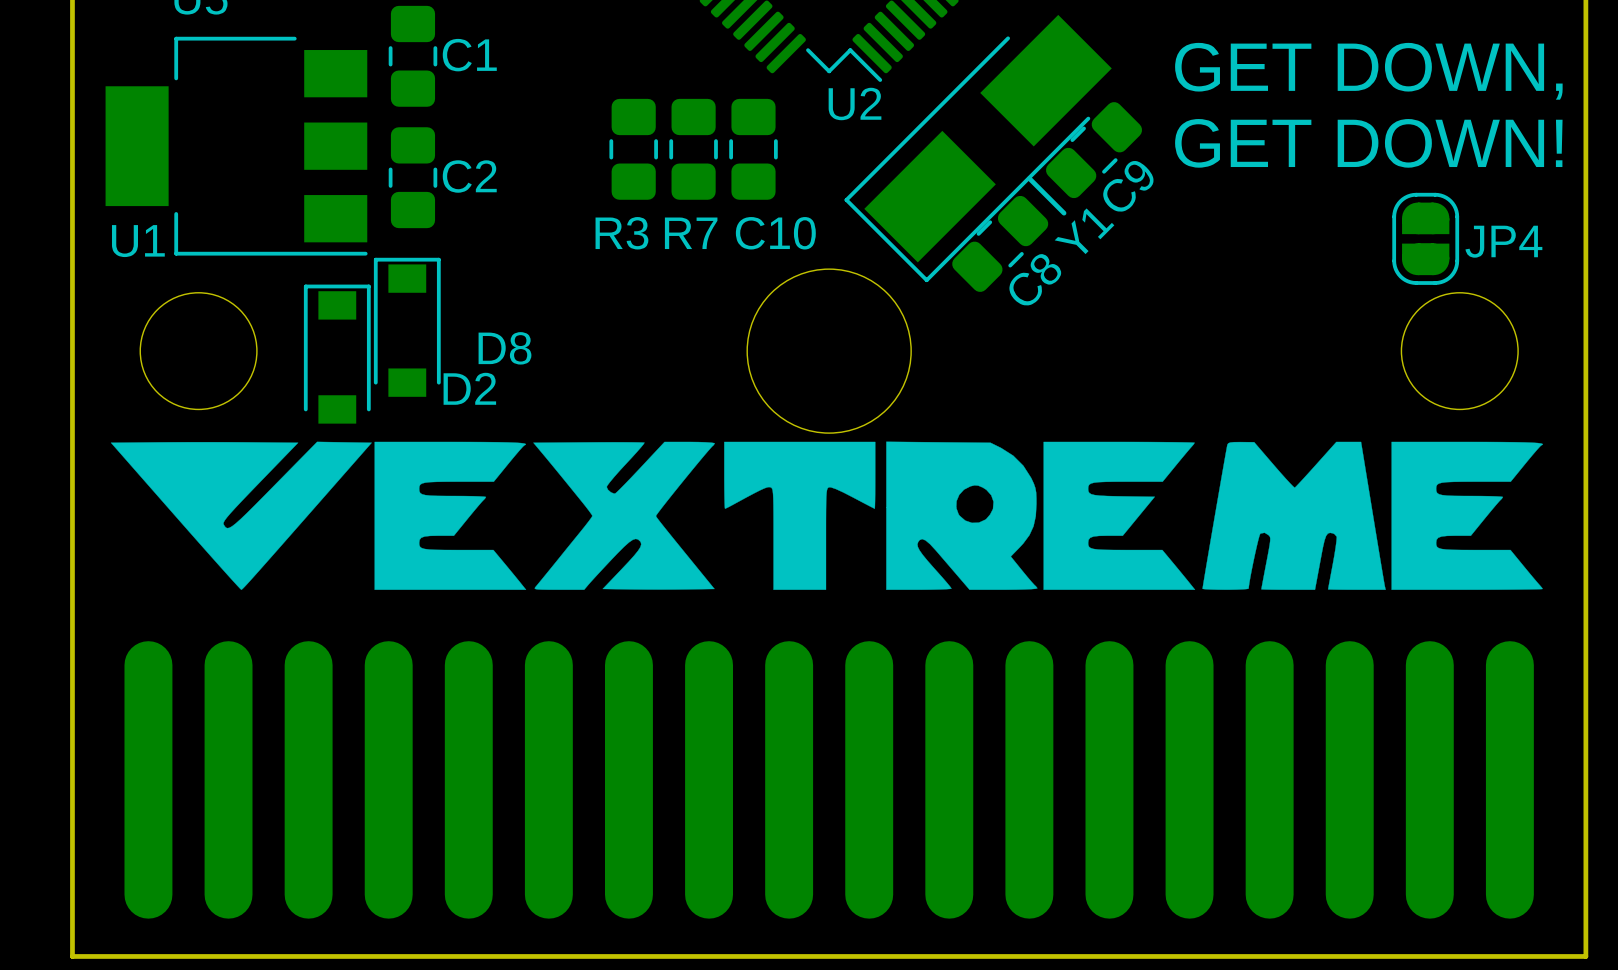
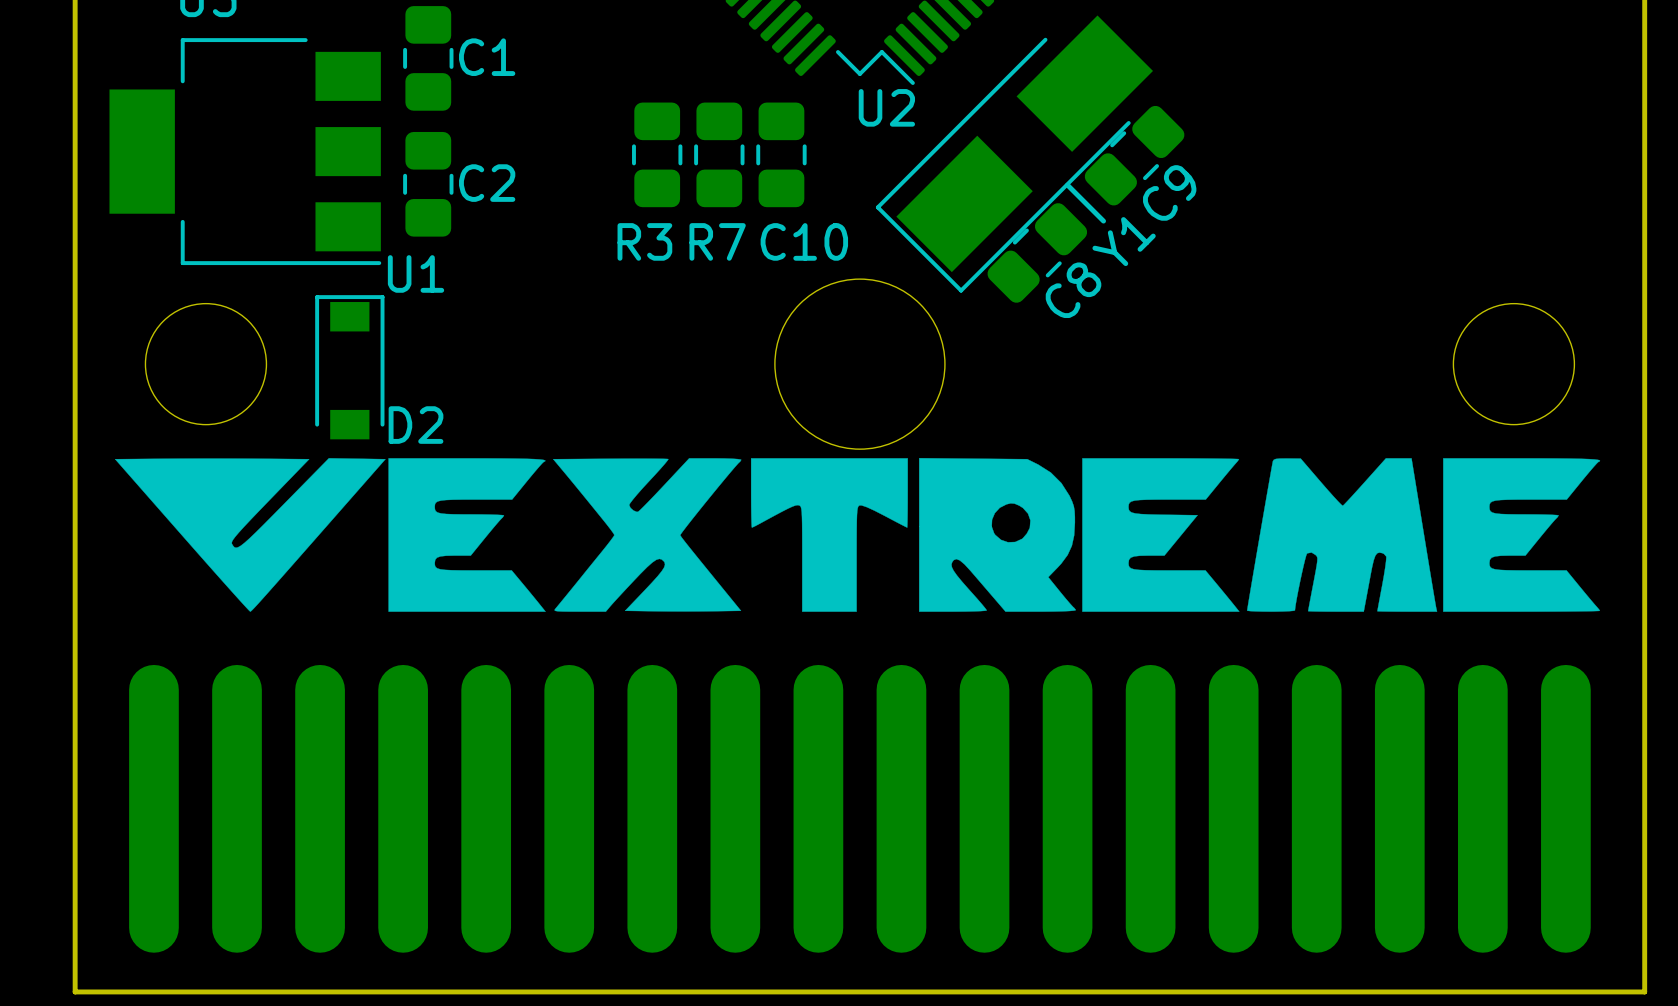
text: GET DOWN, (1368, 71) -> none
text: GET DOWN! (1368, 143) -> none
JP4: (1425, 238) -> none
U1 name position: U1 (138, 241) -> U1 (416, 273)
D8: (407, 327) -> none
D2 name position: D2 (469, 388) -> D2 (416, 425)

